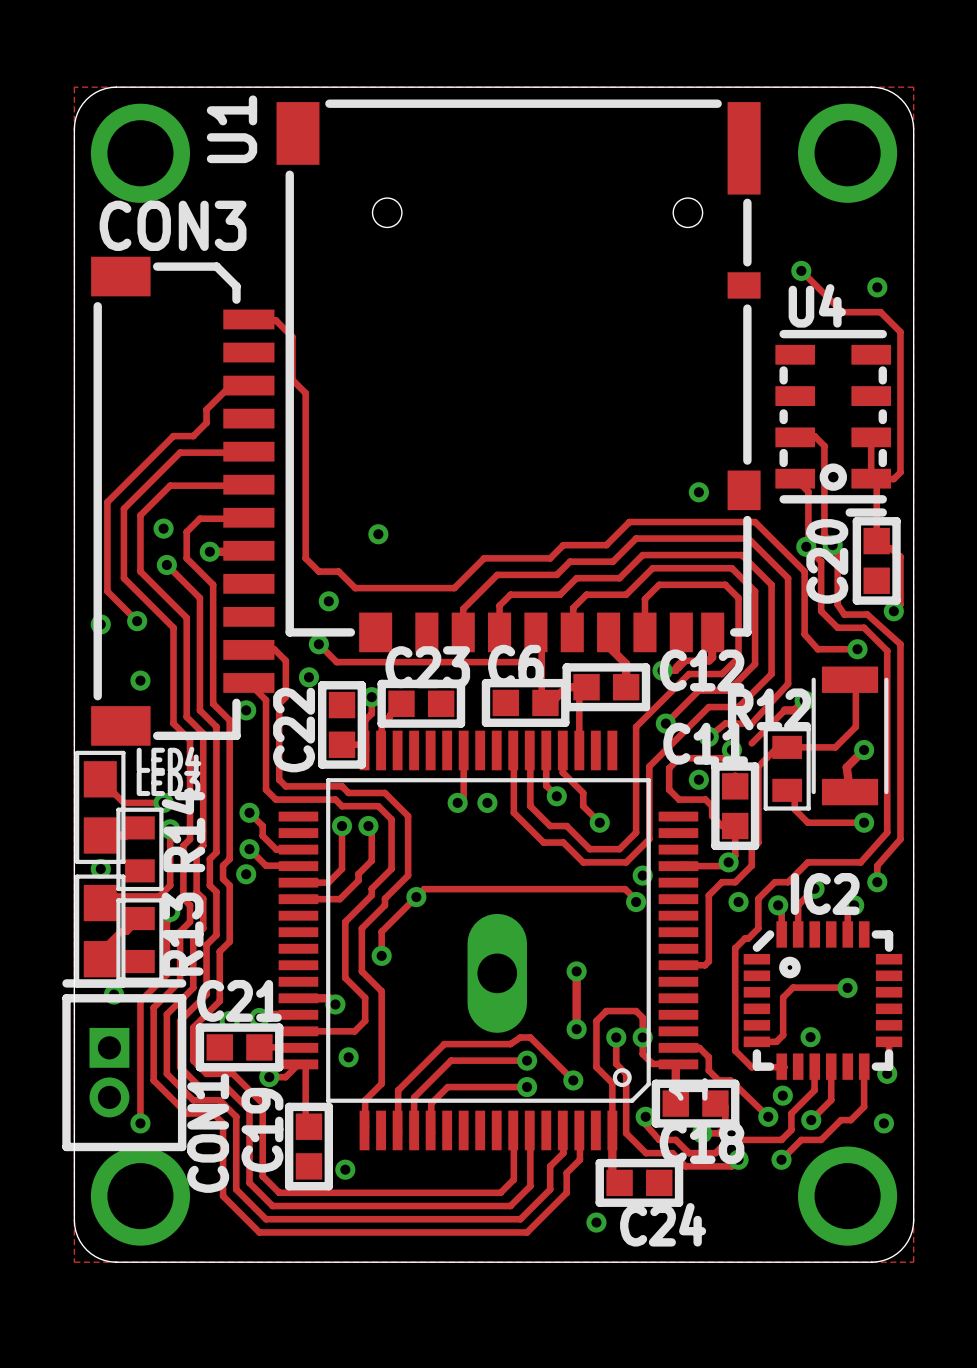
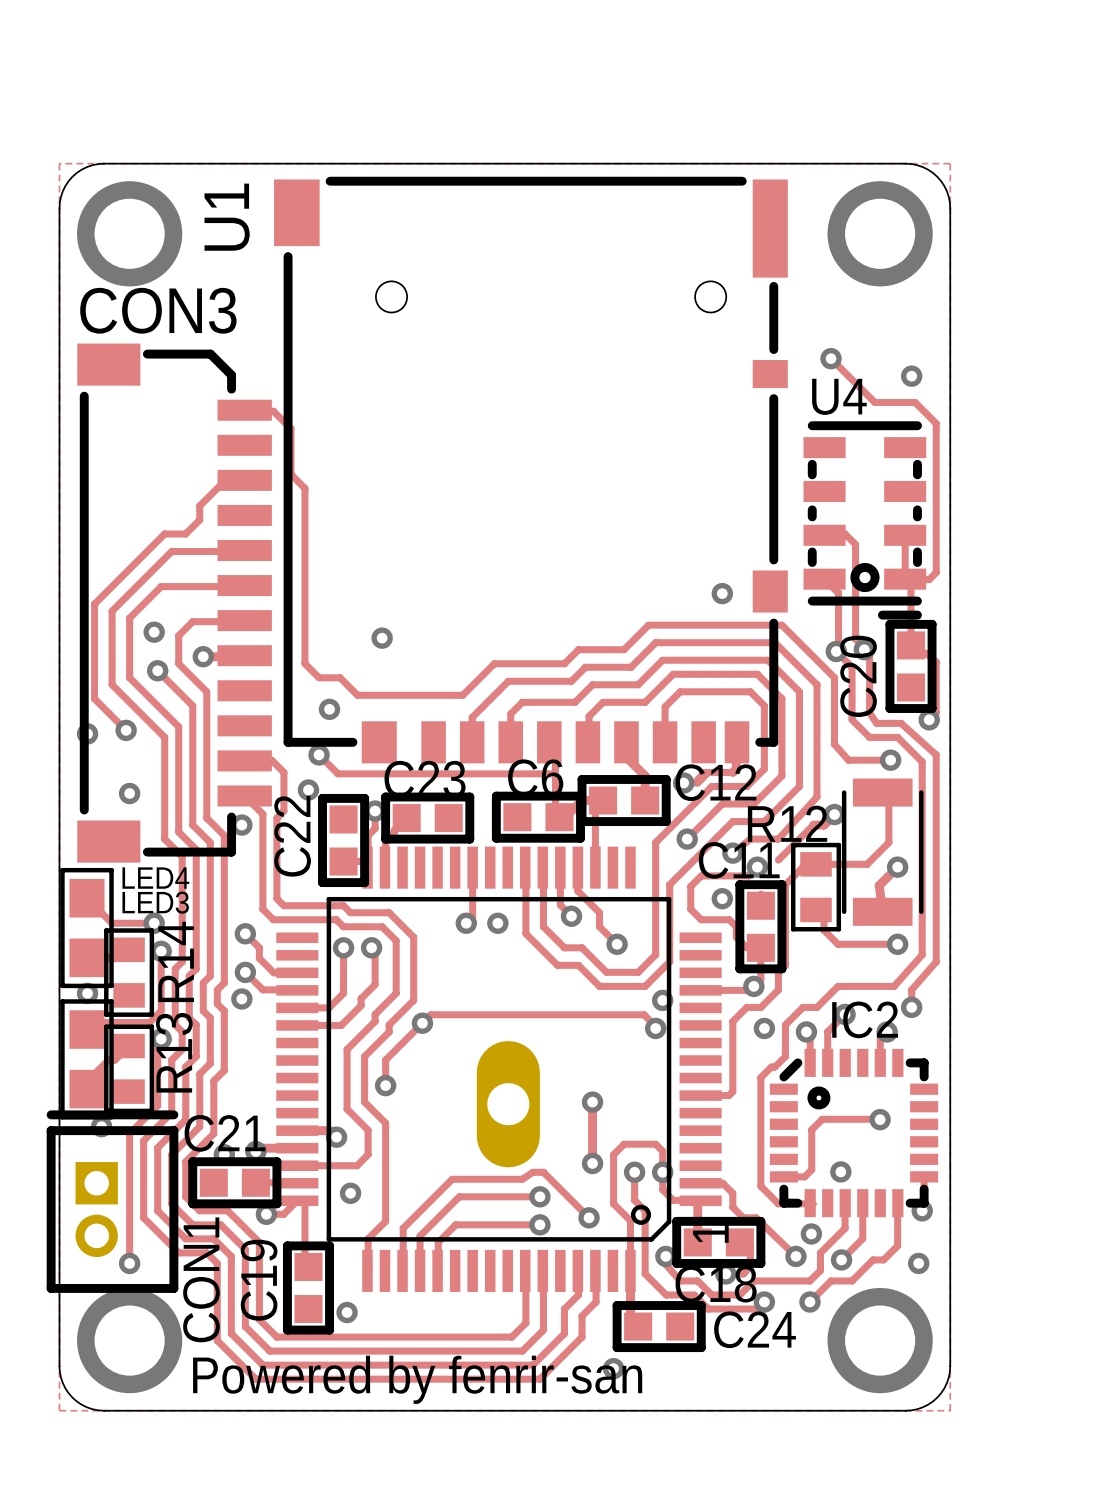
C24 name position: C24 (663, 1224) -> C24 (755, 1329)
text: none -> Powered by fenrir-san (417, 1379)

